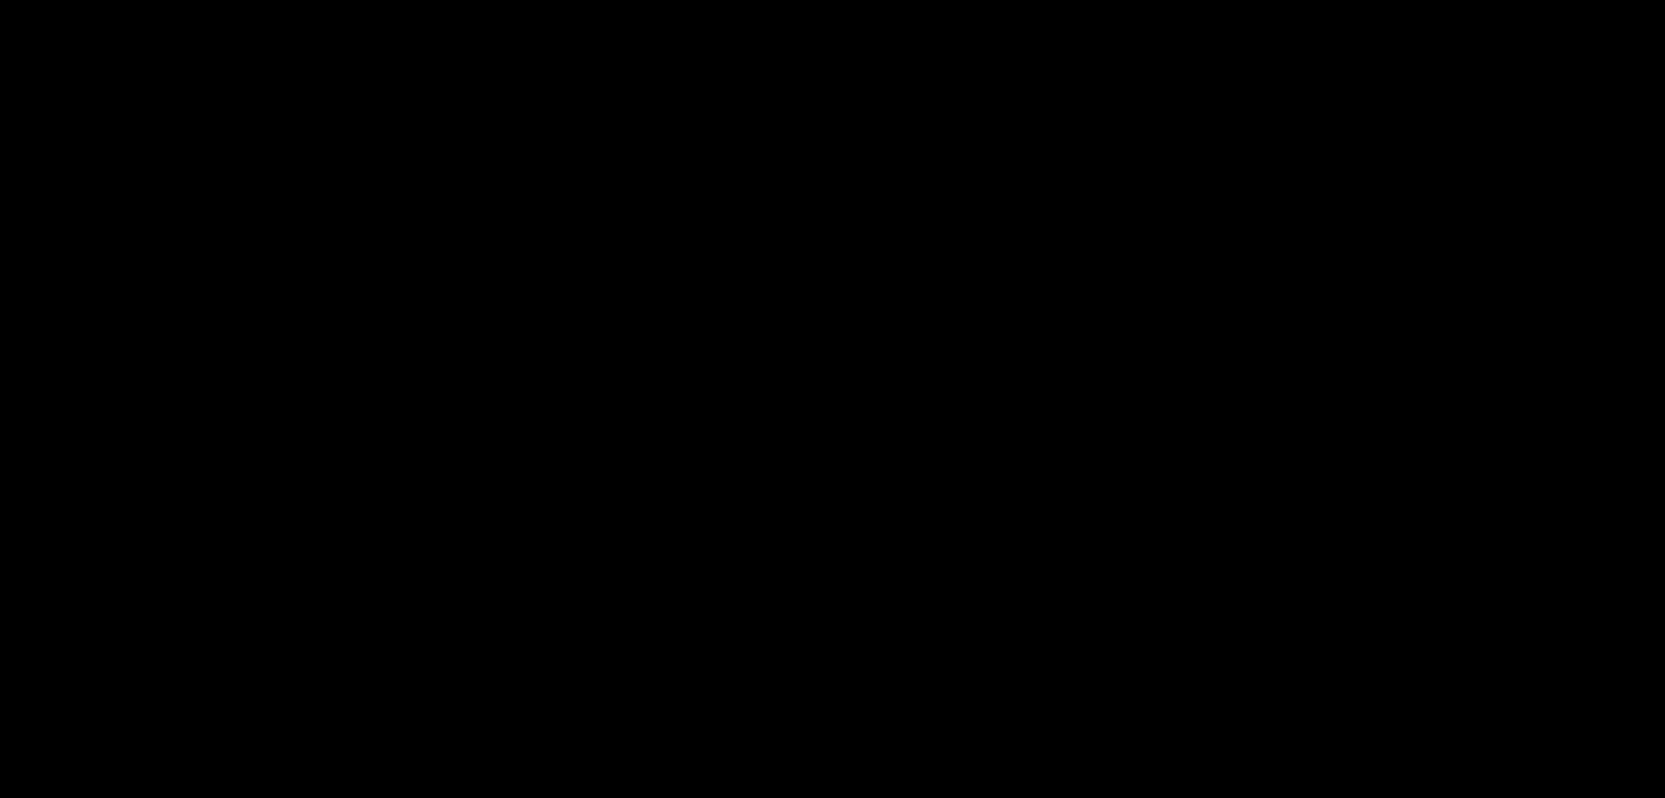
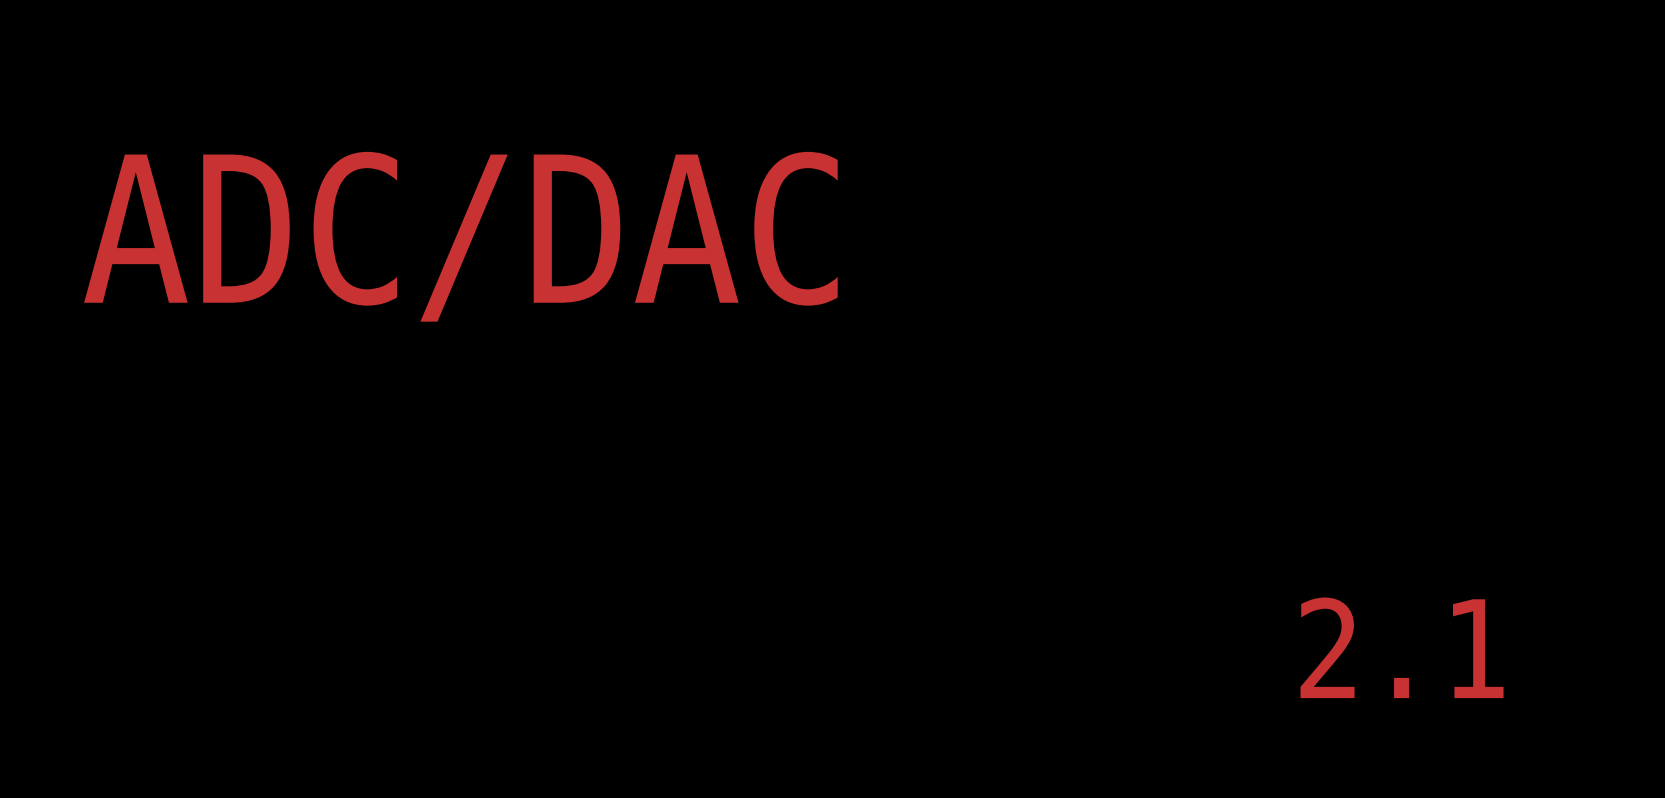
text: none -> ADC/DAC (460, 236)
text: none -> 2.1 (1402, 647)

